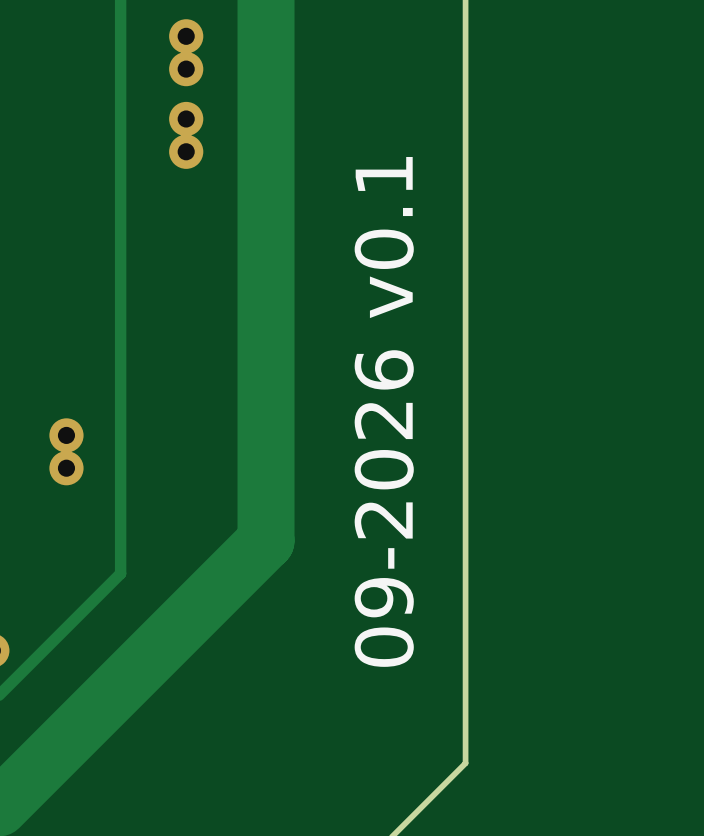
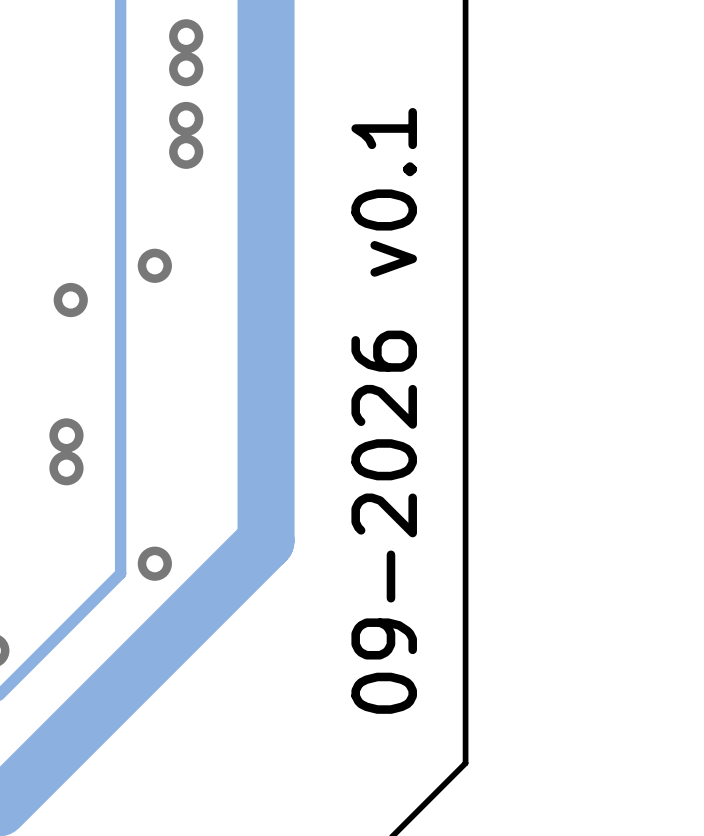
via: none -> (154, 265)
via: none -> (70, 300)
via: none -> (154, 563)

